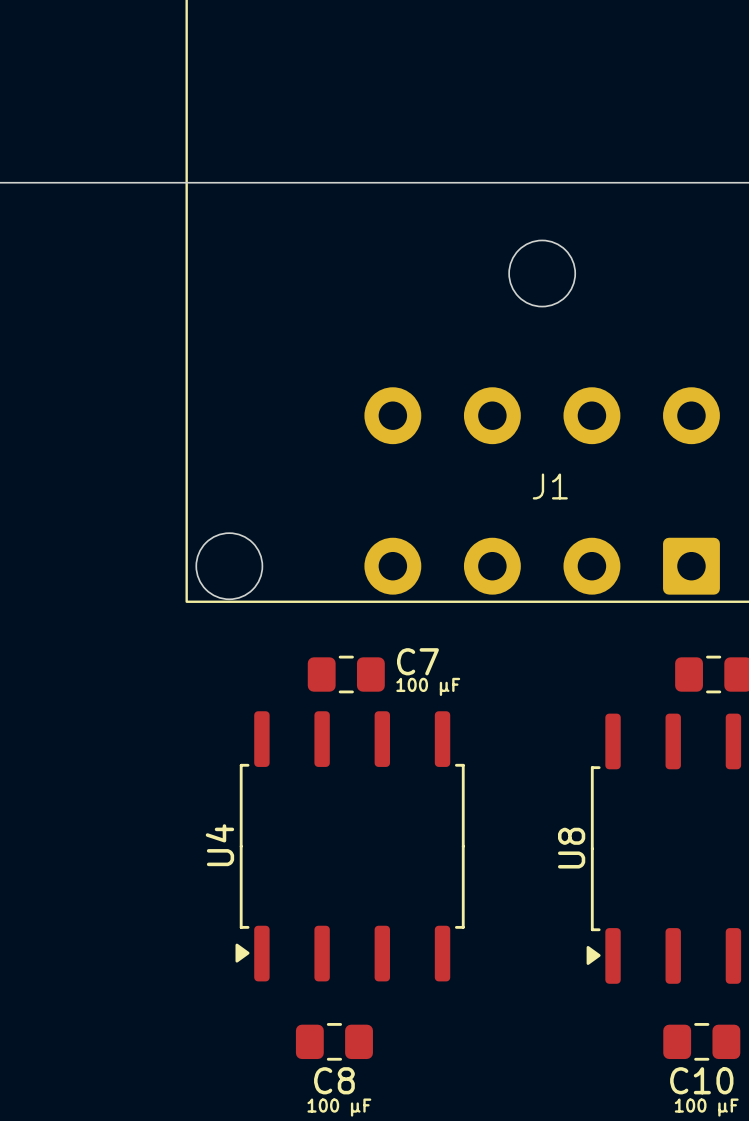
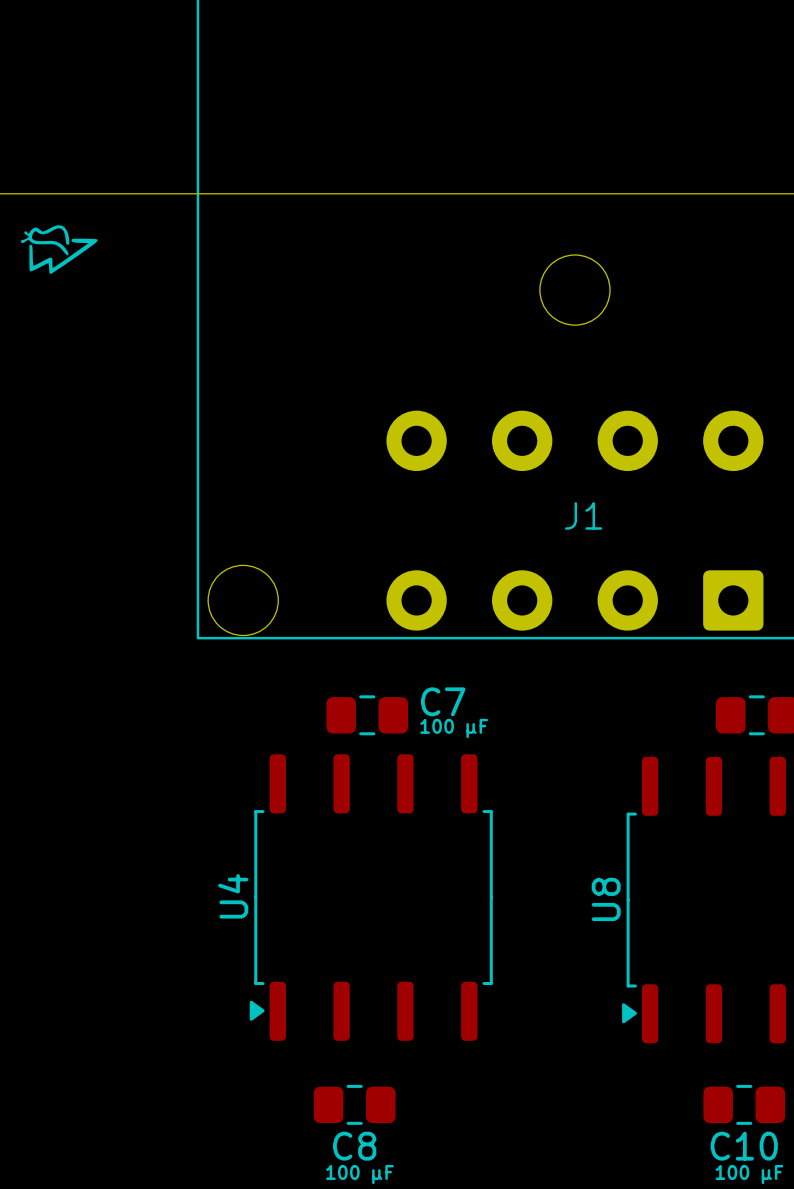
drawing: none -> [21, 225, 98, 275]

